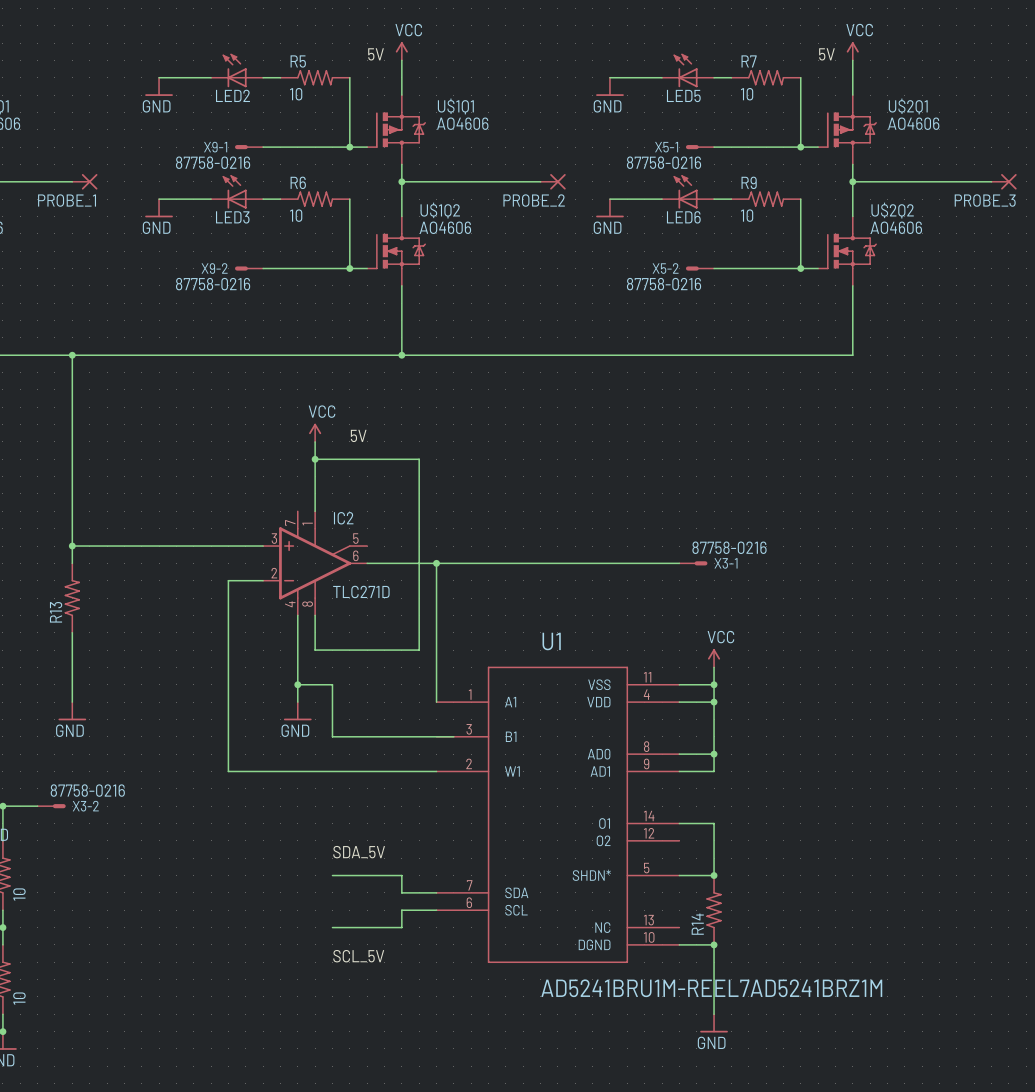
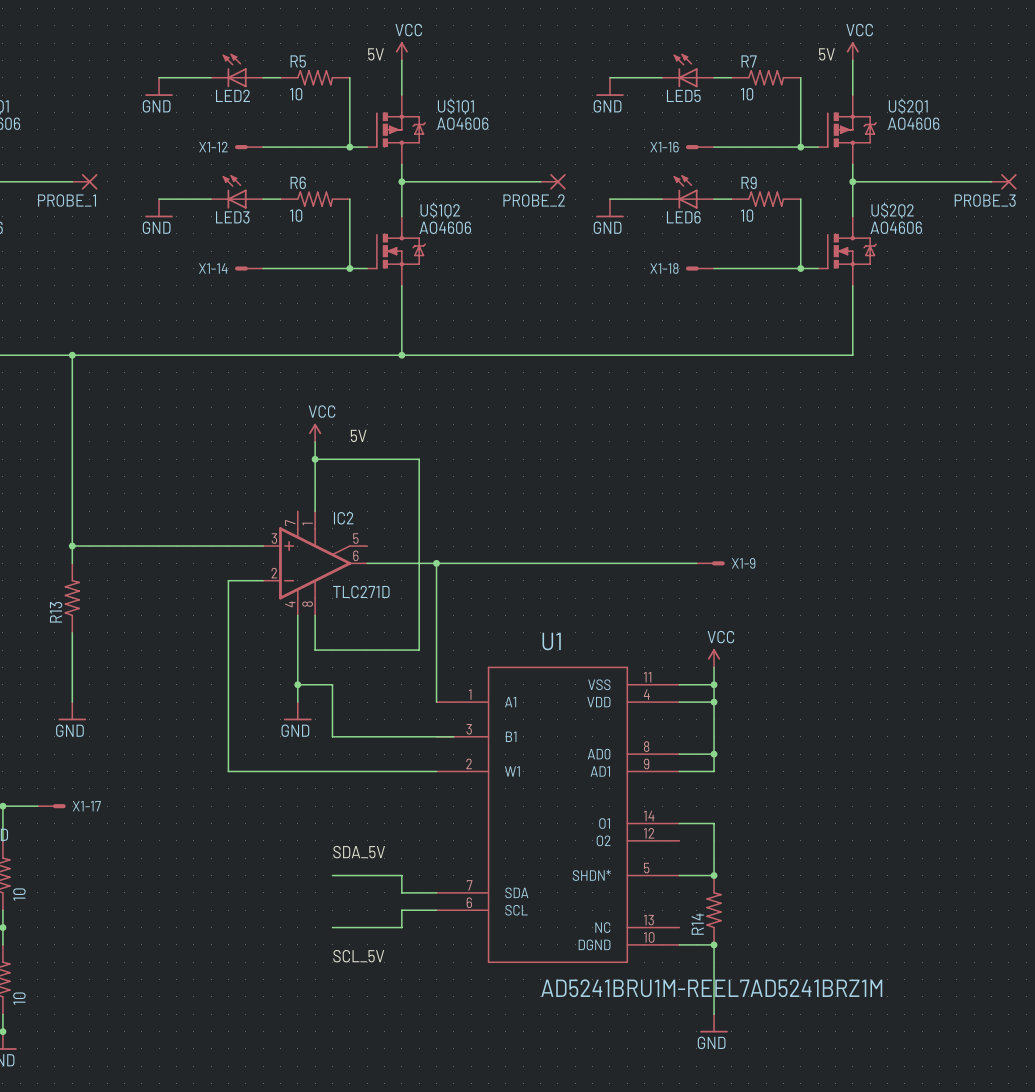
X9-1 name: X9-1 (215, 147) -> X1-12 (213, 147)
X5-1 name: X5-1 (666, 147) -> X1-16 (664, 147)
X9-1 value: 87758-0216 (213, 162) -> none
X5-1 value: 87758-0216 (664, 162) -> none
X9-2 name: X9-2 (214, 268) -> X1-14 (213, 268)
X5-2 name: X5-2 (665, 268) -> X1-18 (664, 268)
X9-2 value: 87758-0216 (213, 284) -> none
X5-2 value: 87758-0216 (664, 284) -> none
X3-1: 87758-0216 (693, 563) -> none
X1-9: none -> (710, 563)
X3-2 value: 87758-0216 (87, 790) -> none
X3-2 name: X3-2 (85, 806) -> X1-17 (86, 806)

